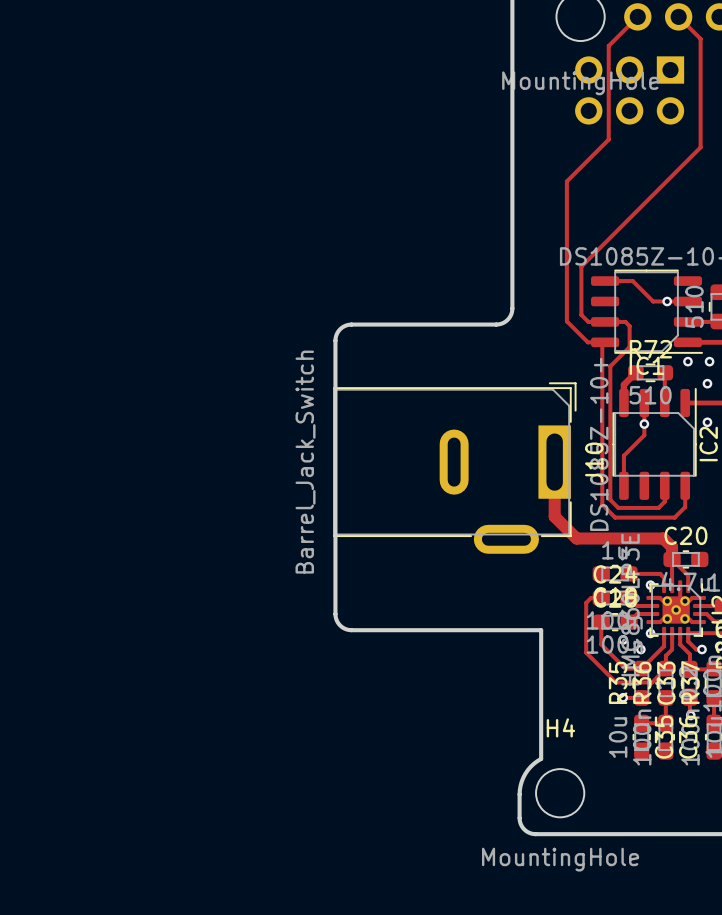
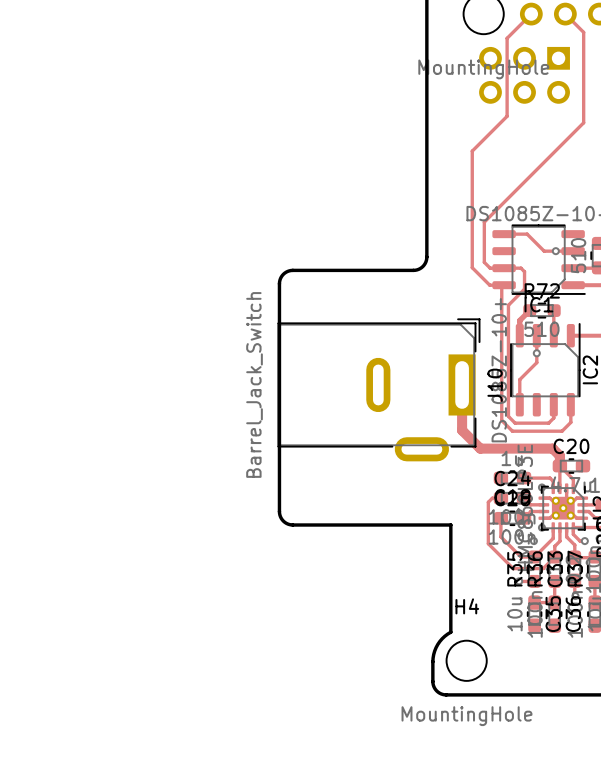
via: (687, 361) -> none
via: (709, 361) -> none
via: (707, 383) -> none
via: (707, 422) -> none

